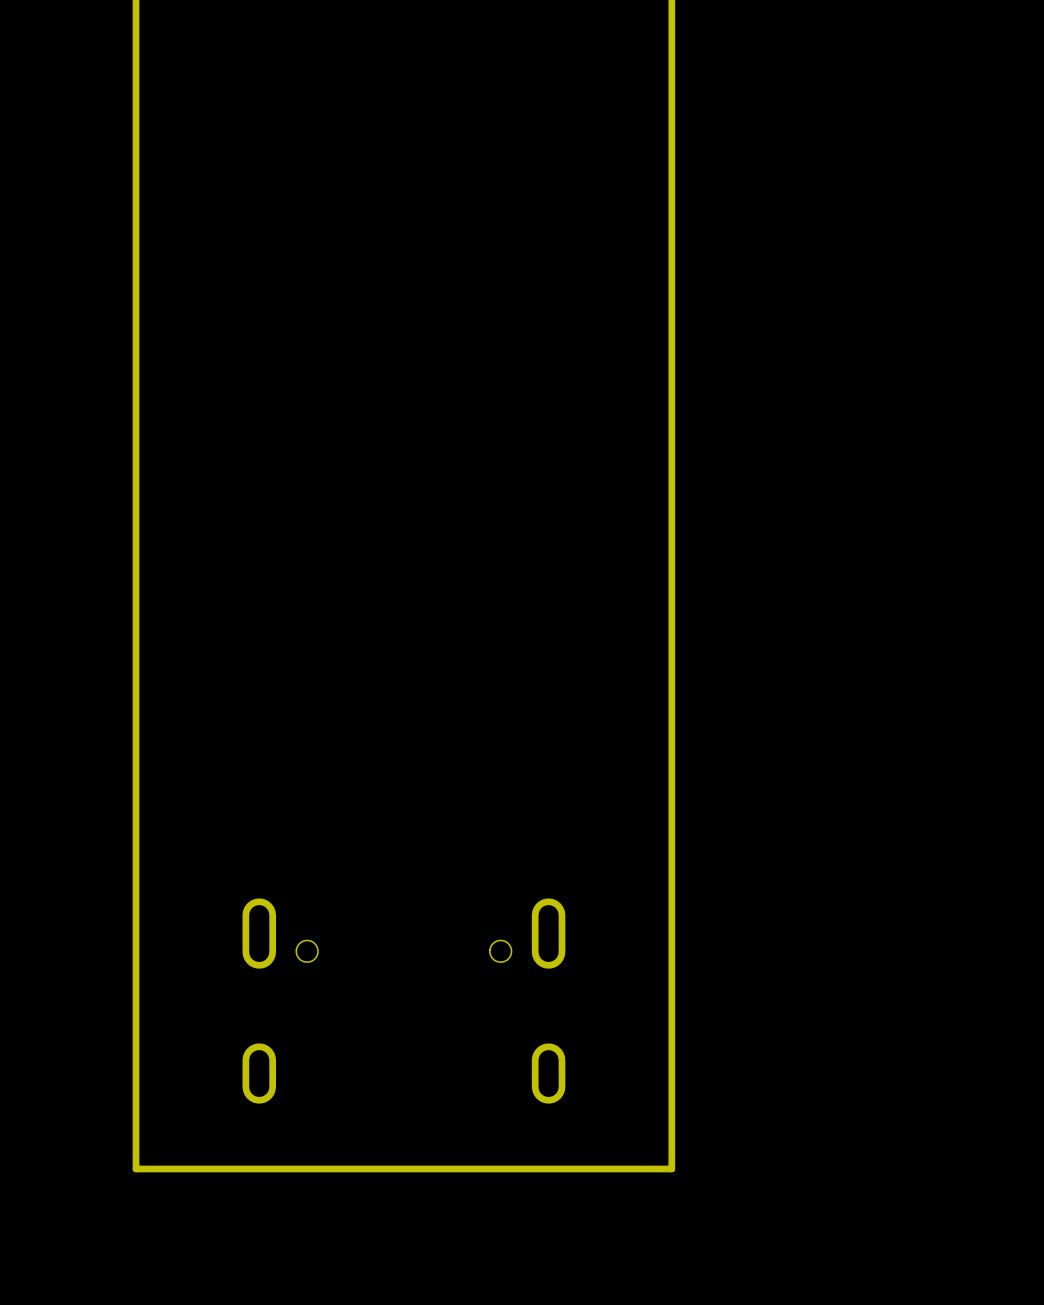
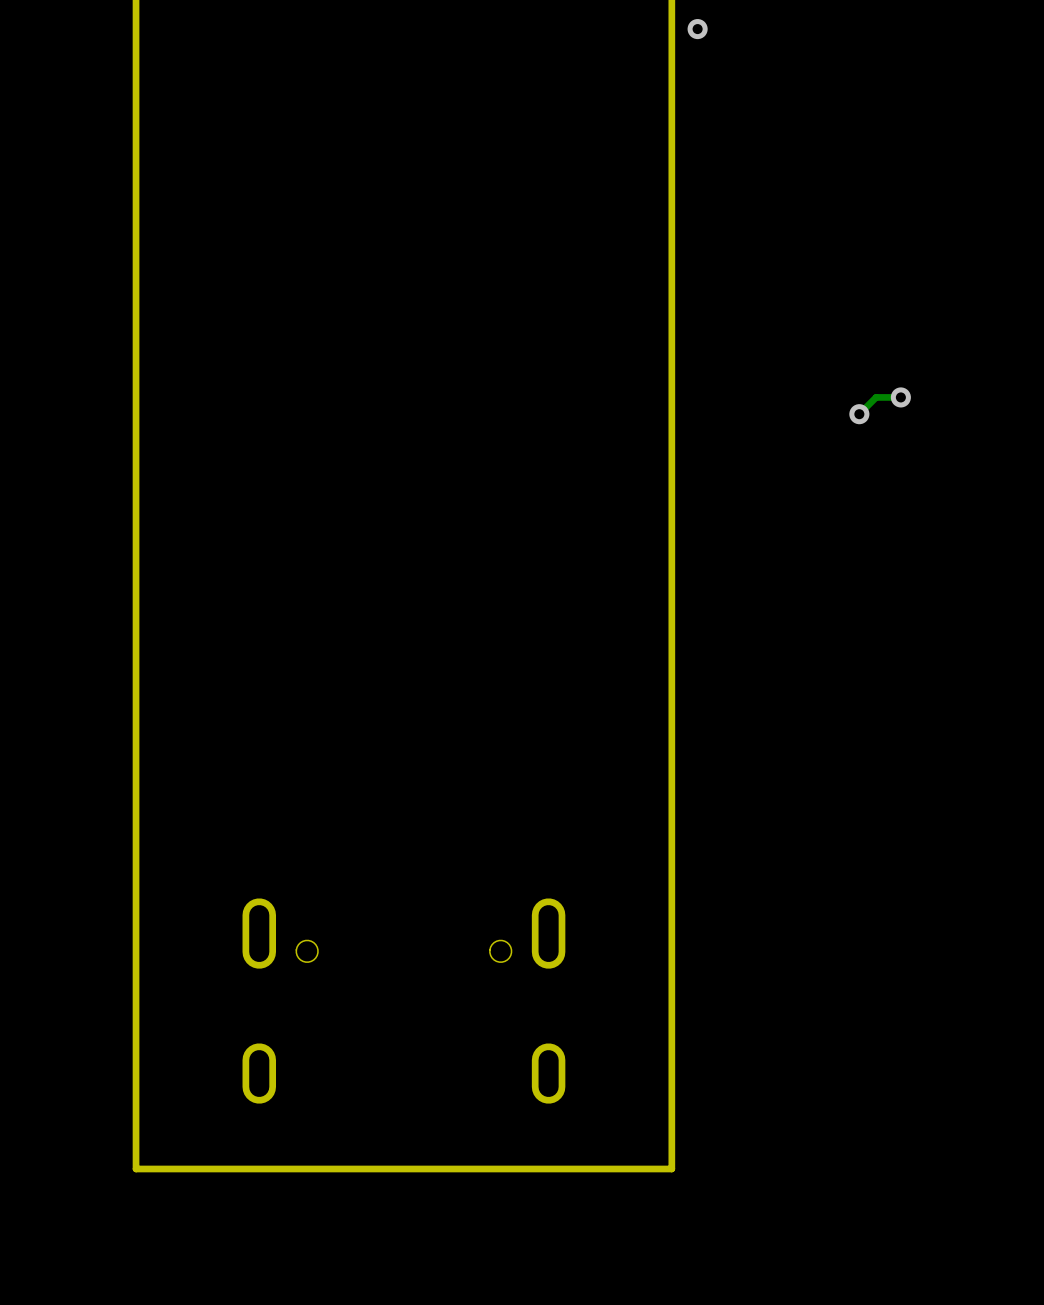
via: none -> (697, 29)
track: none -> (900, 397) (876, 397) (859, 414)
via: none -> (900, 397)
via: none -> (859, 414)

